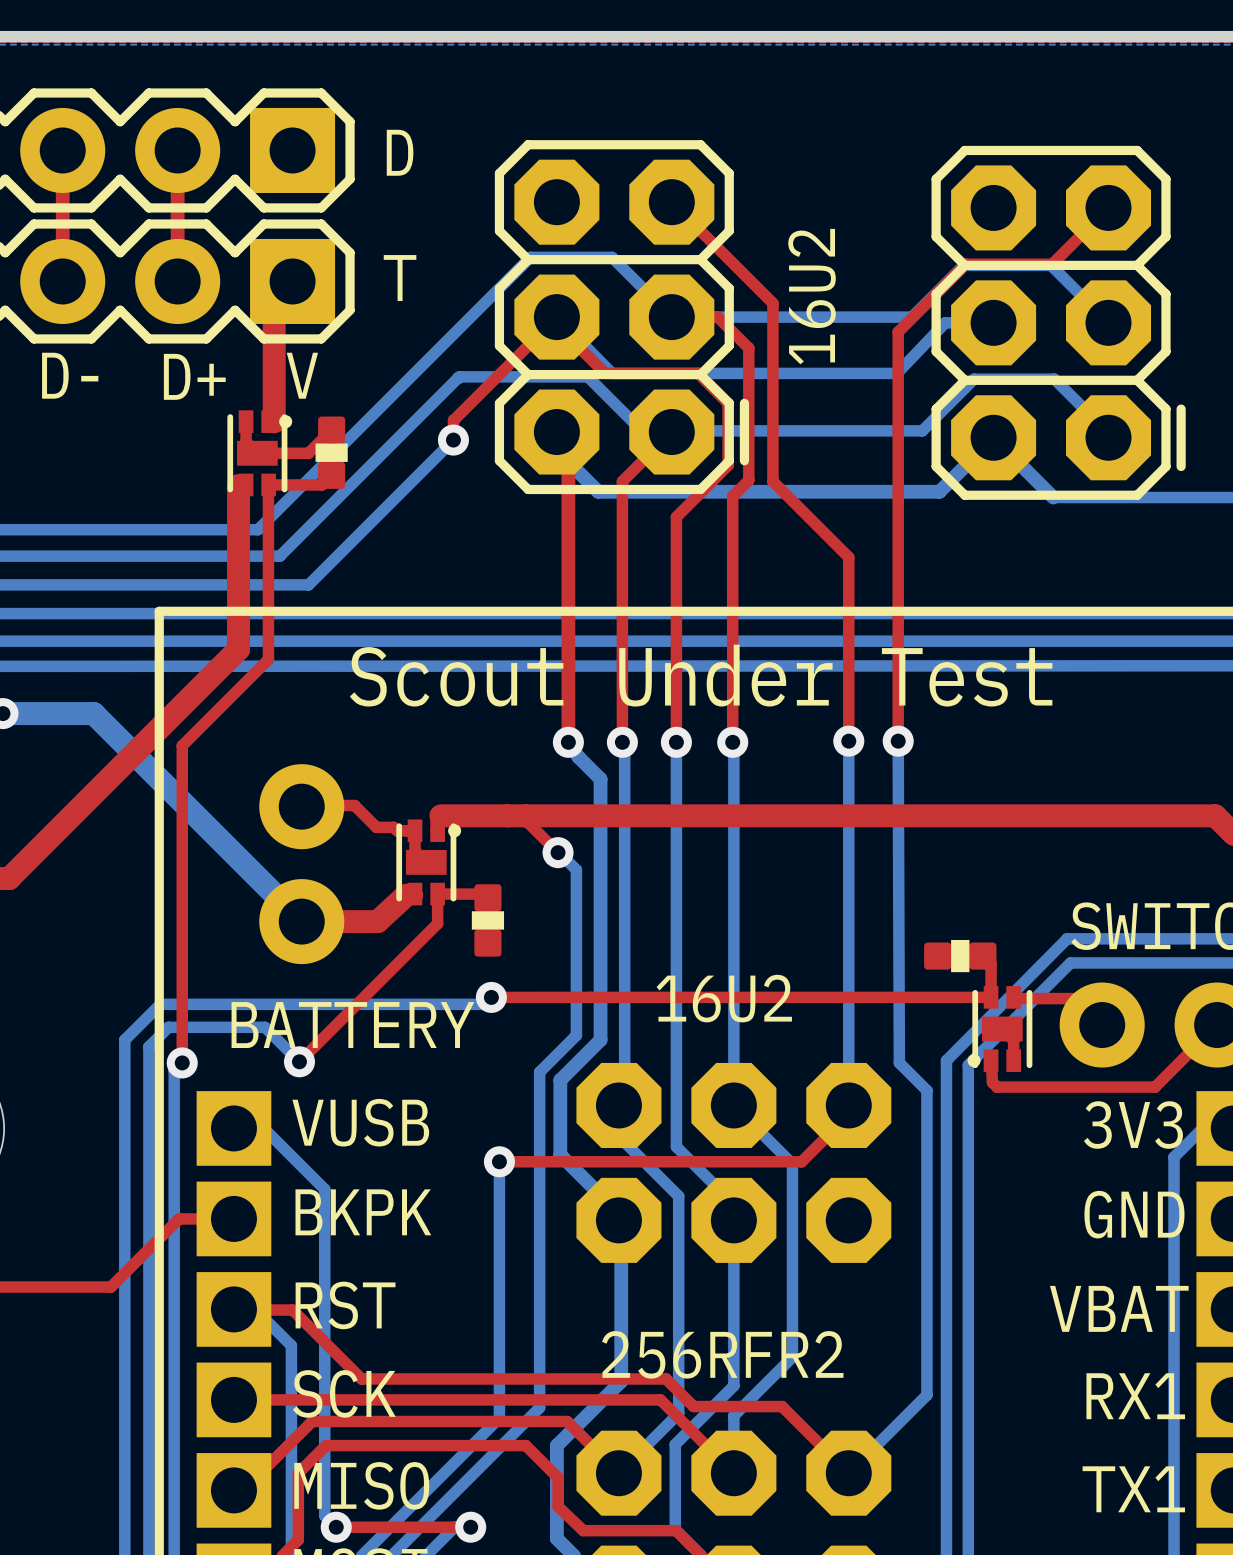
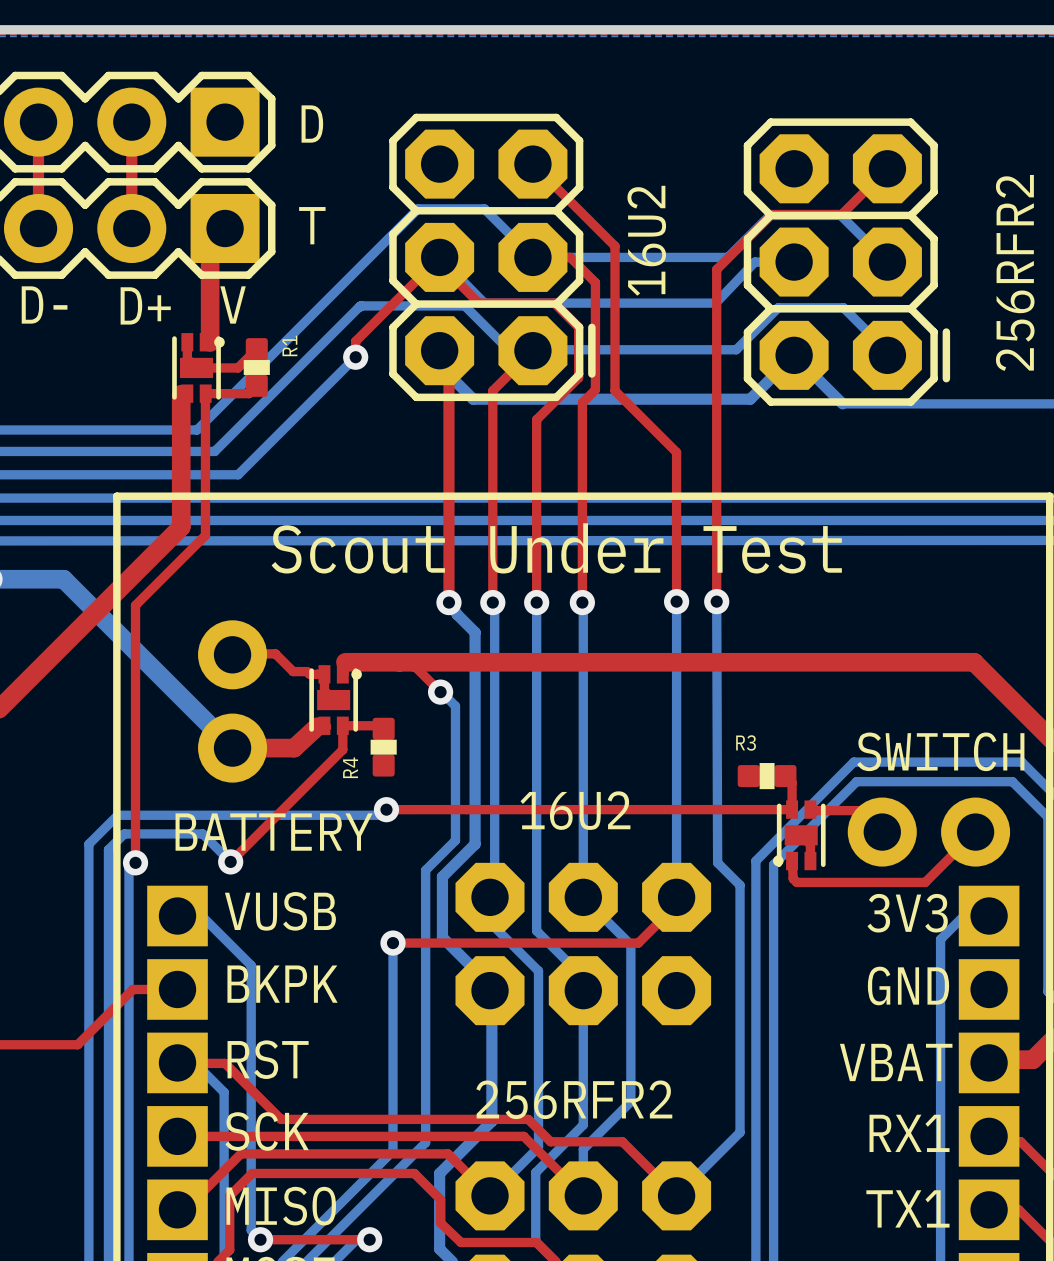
R1 name: none -> R1 (289, 345)
R3 name: none -> R3 (746, 742)
R4 name: none -> R4 (350, 767)

